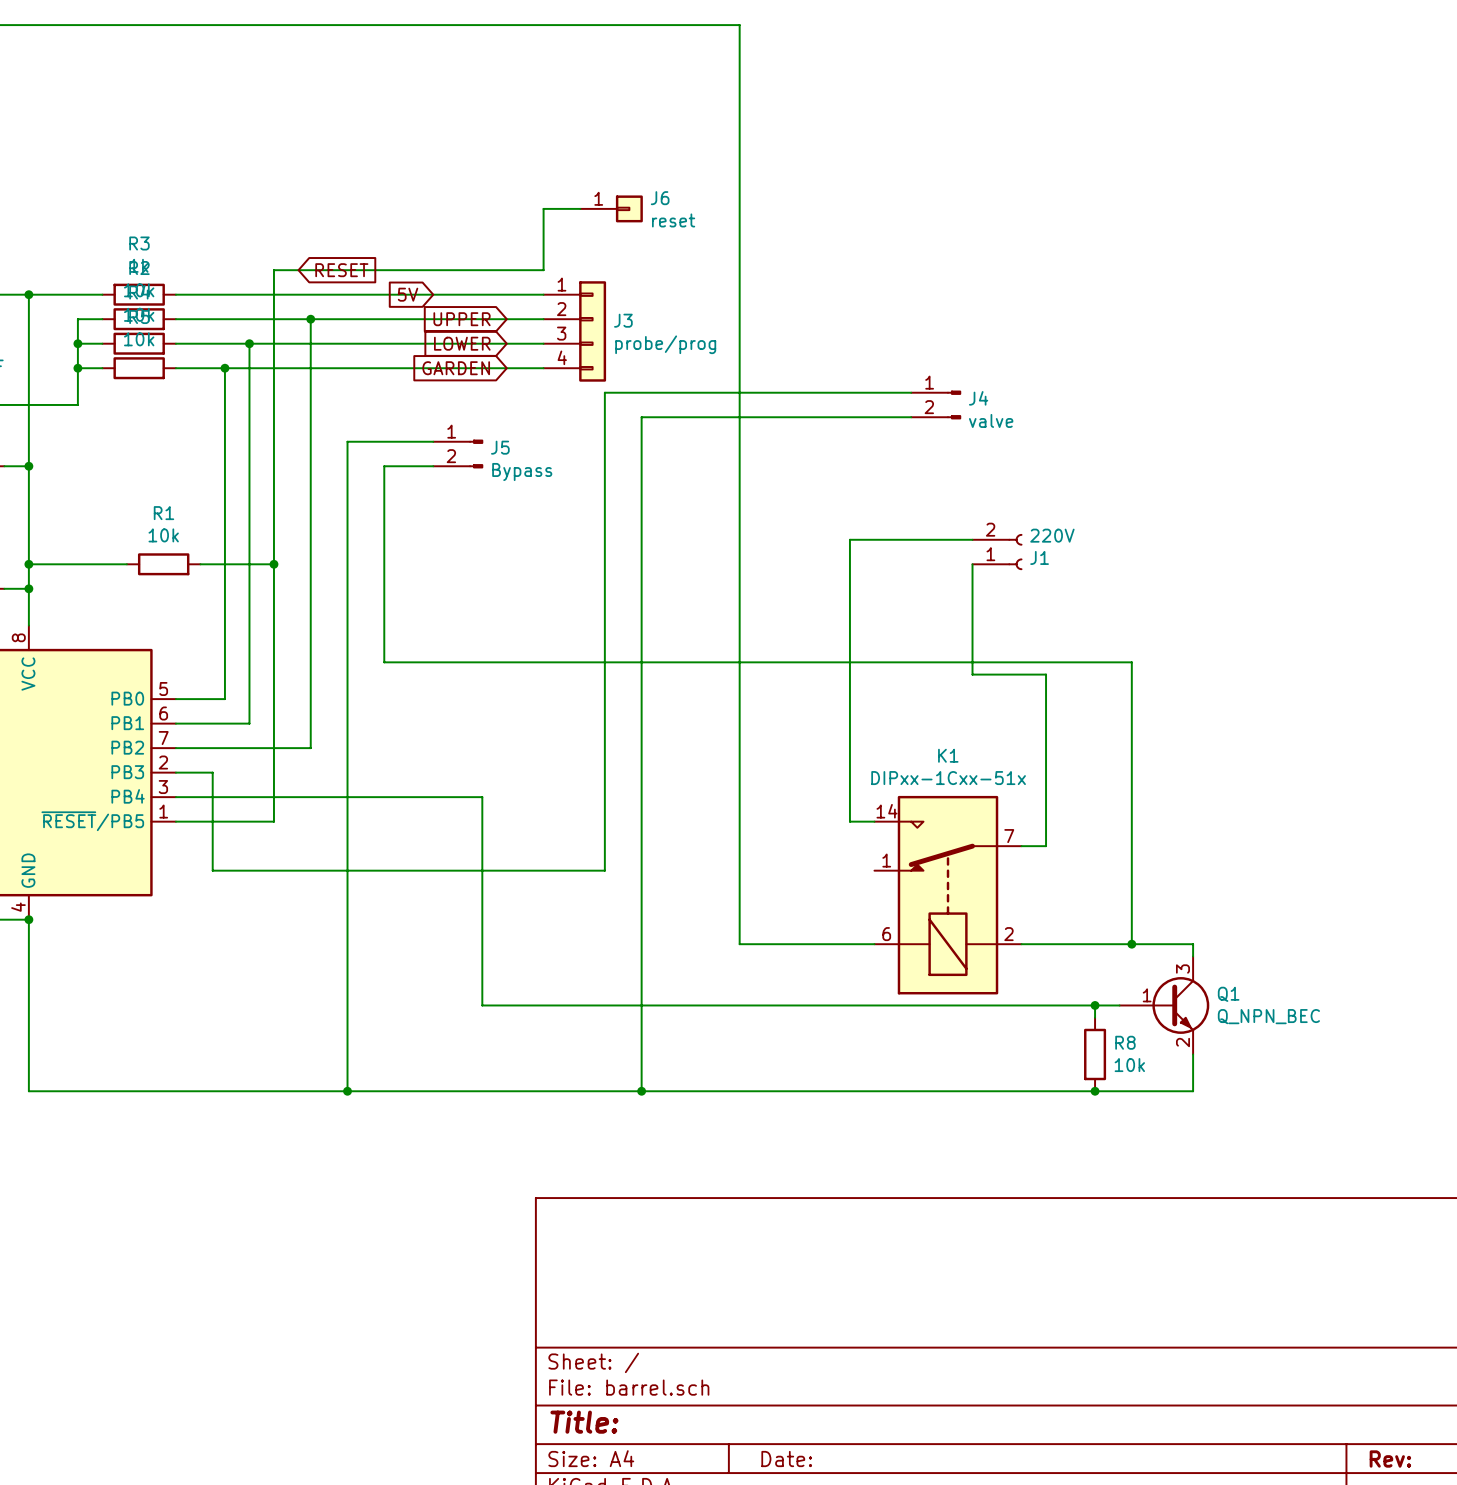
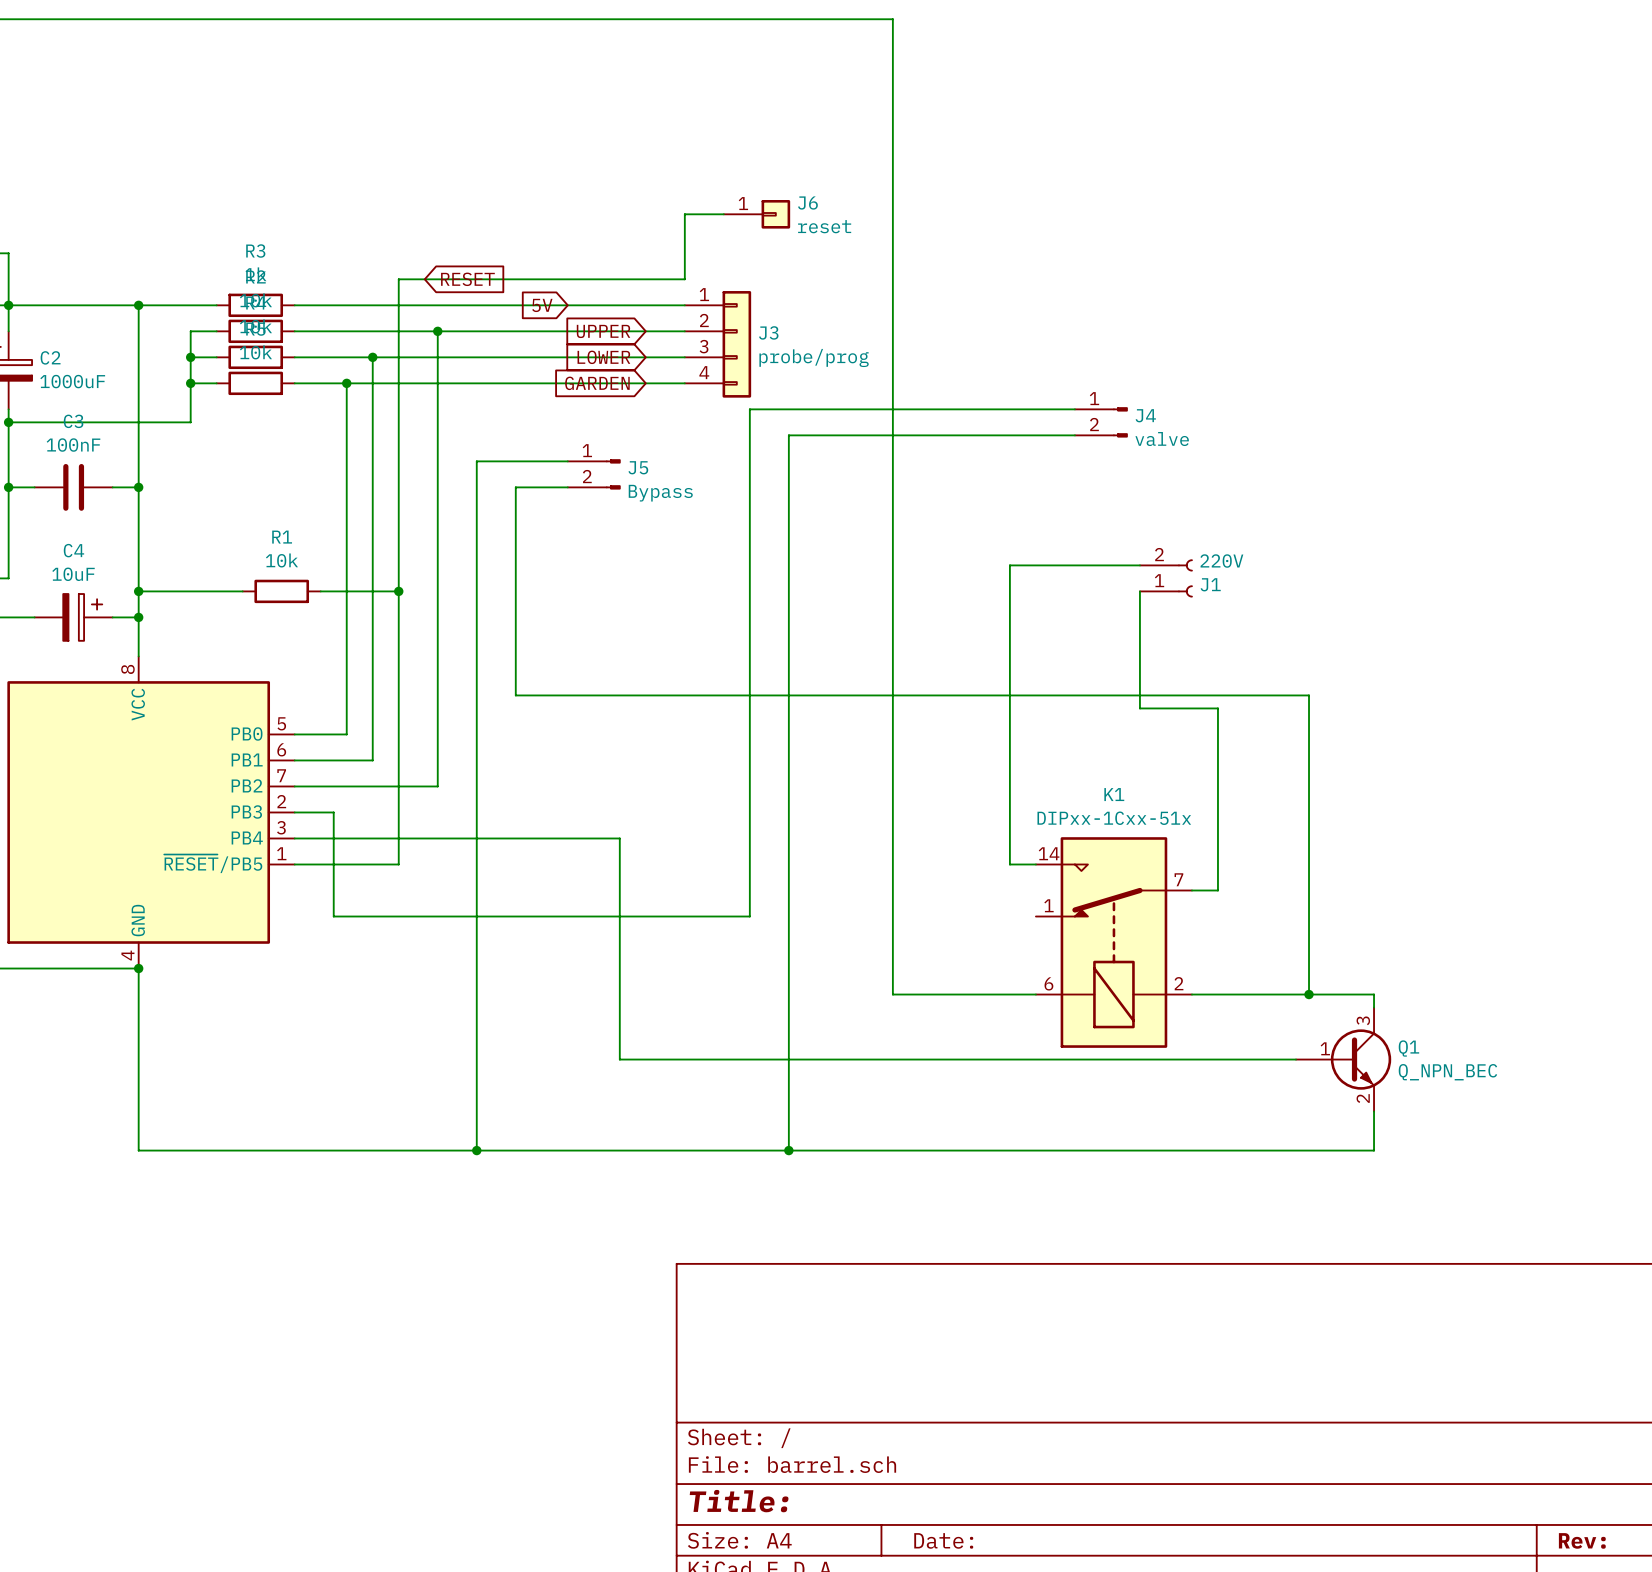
wire: (1095, 1005) (1095, 1017) -> none
junction: (1095, 1005) -> none
R8: 10k (1095, 1054) -> none
junction: (1095, 1091) -> none

